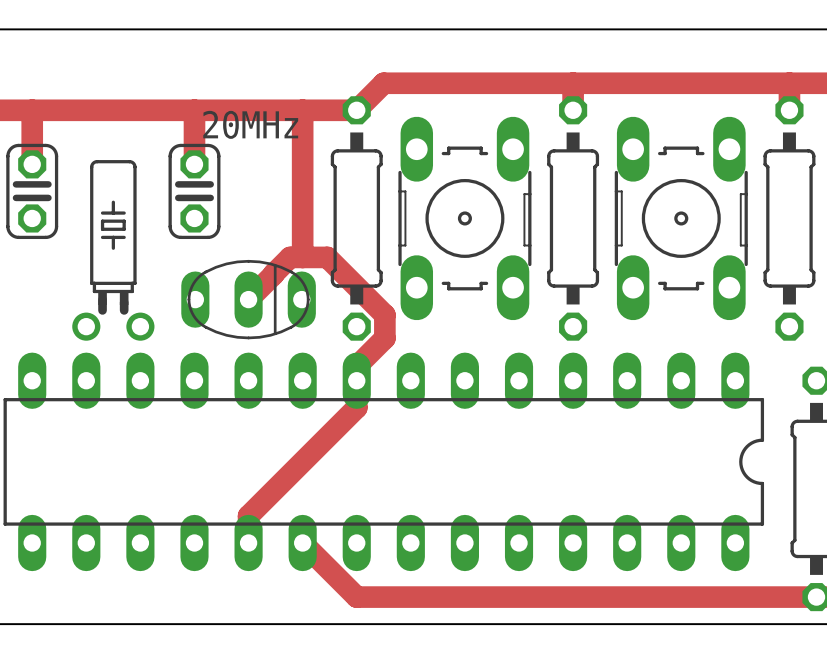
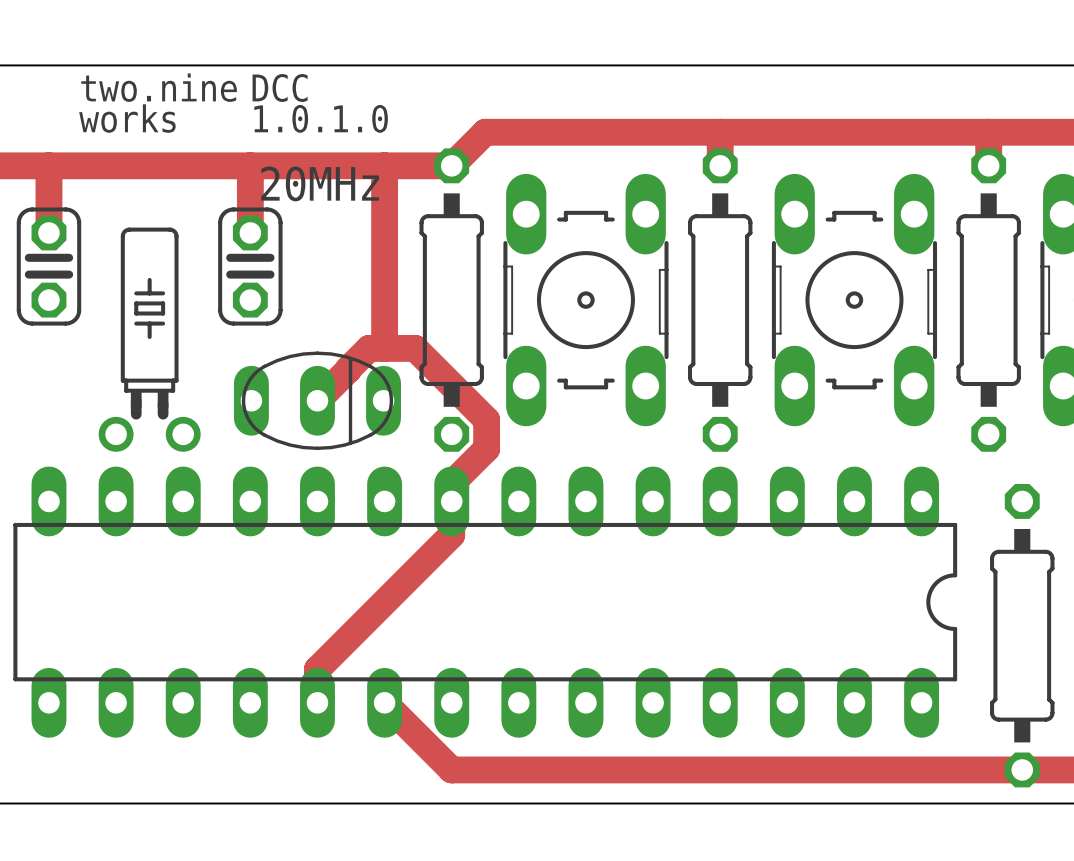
text: none -> two.nine (159, 87)
text: none -> DCC (280, 87)
text: none -> works (127, 118)
text: none -> 1.0.1.0 (321, 118)

